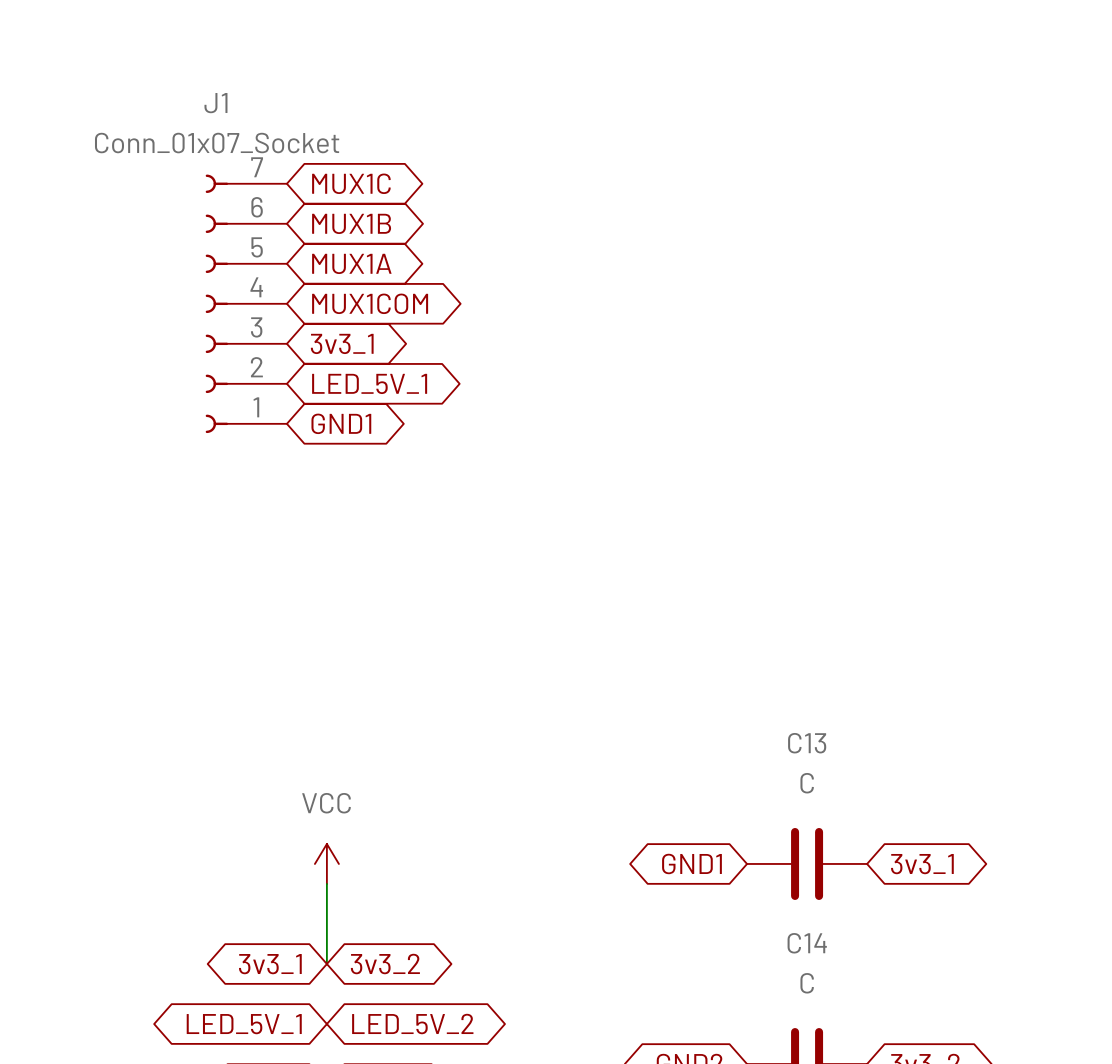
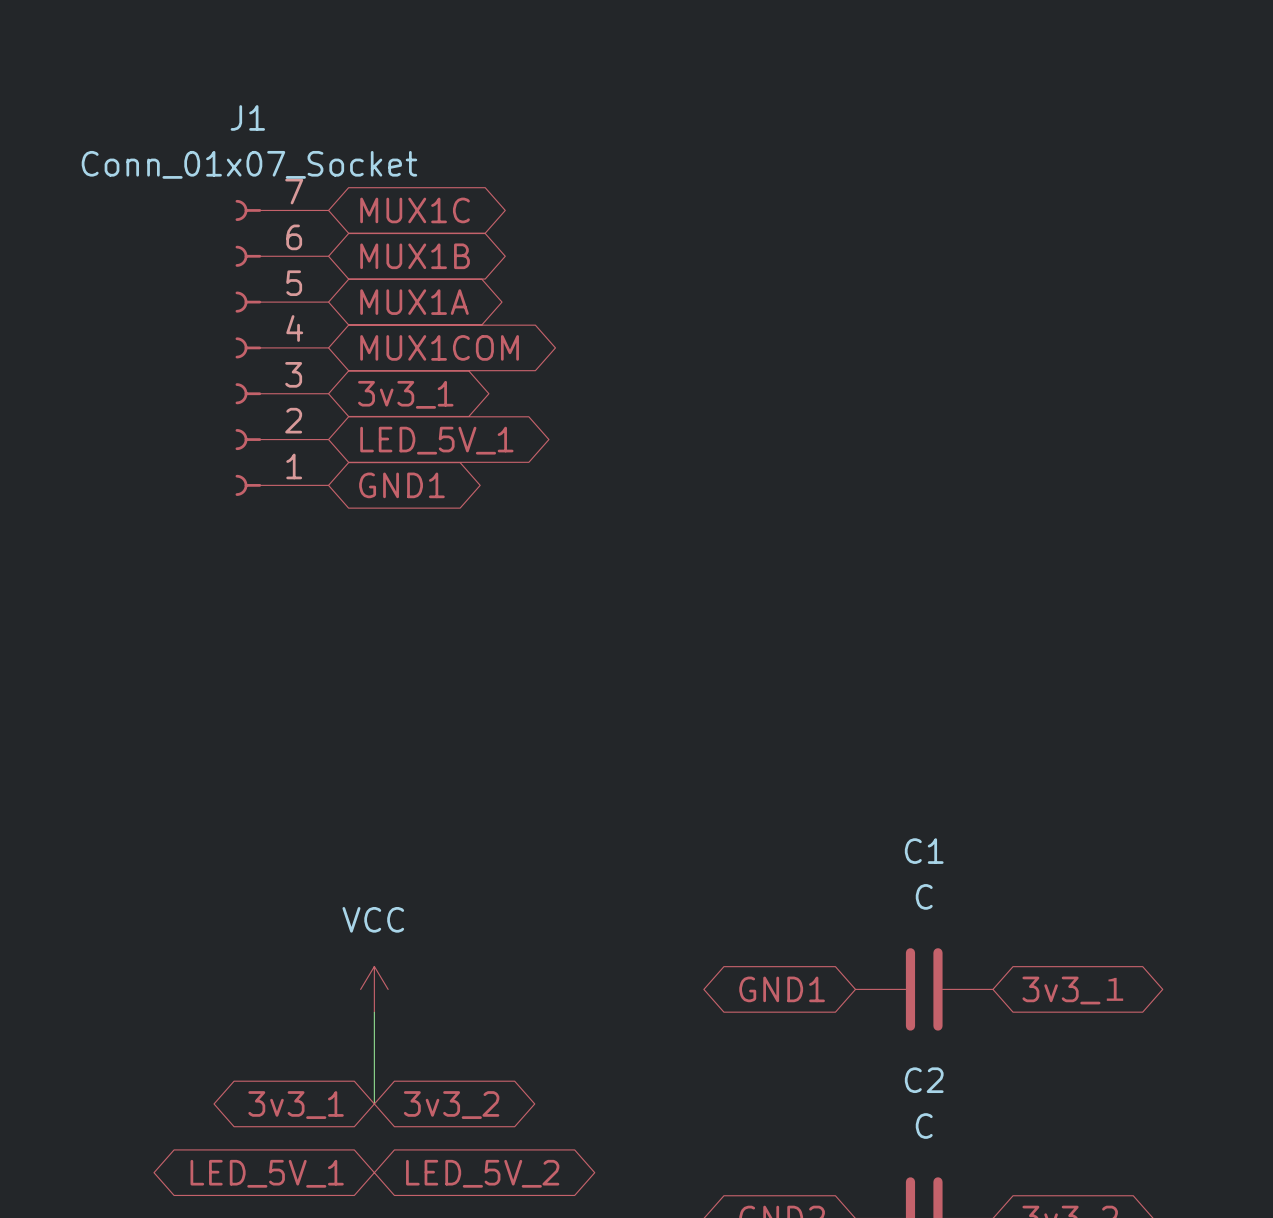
C13 name: C13 (807, 743) -> C1 (924, 851)
global label: 3v3_1 (922, 864) -> 3v3_１ (1073, 990)
C14 name: C14 (807, 943) -> C2 (924, 1080)

